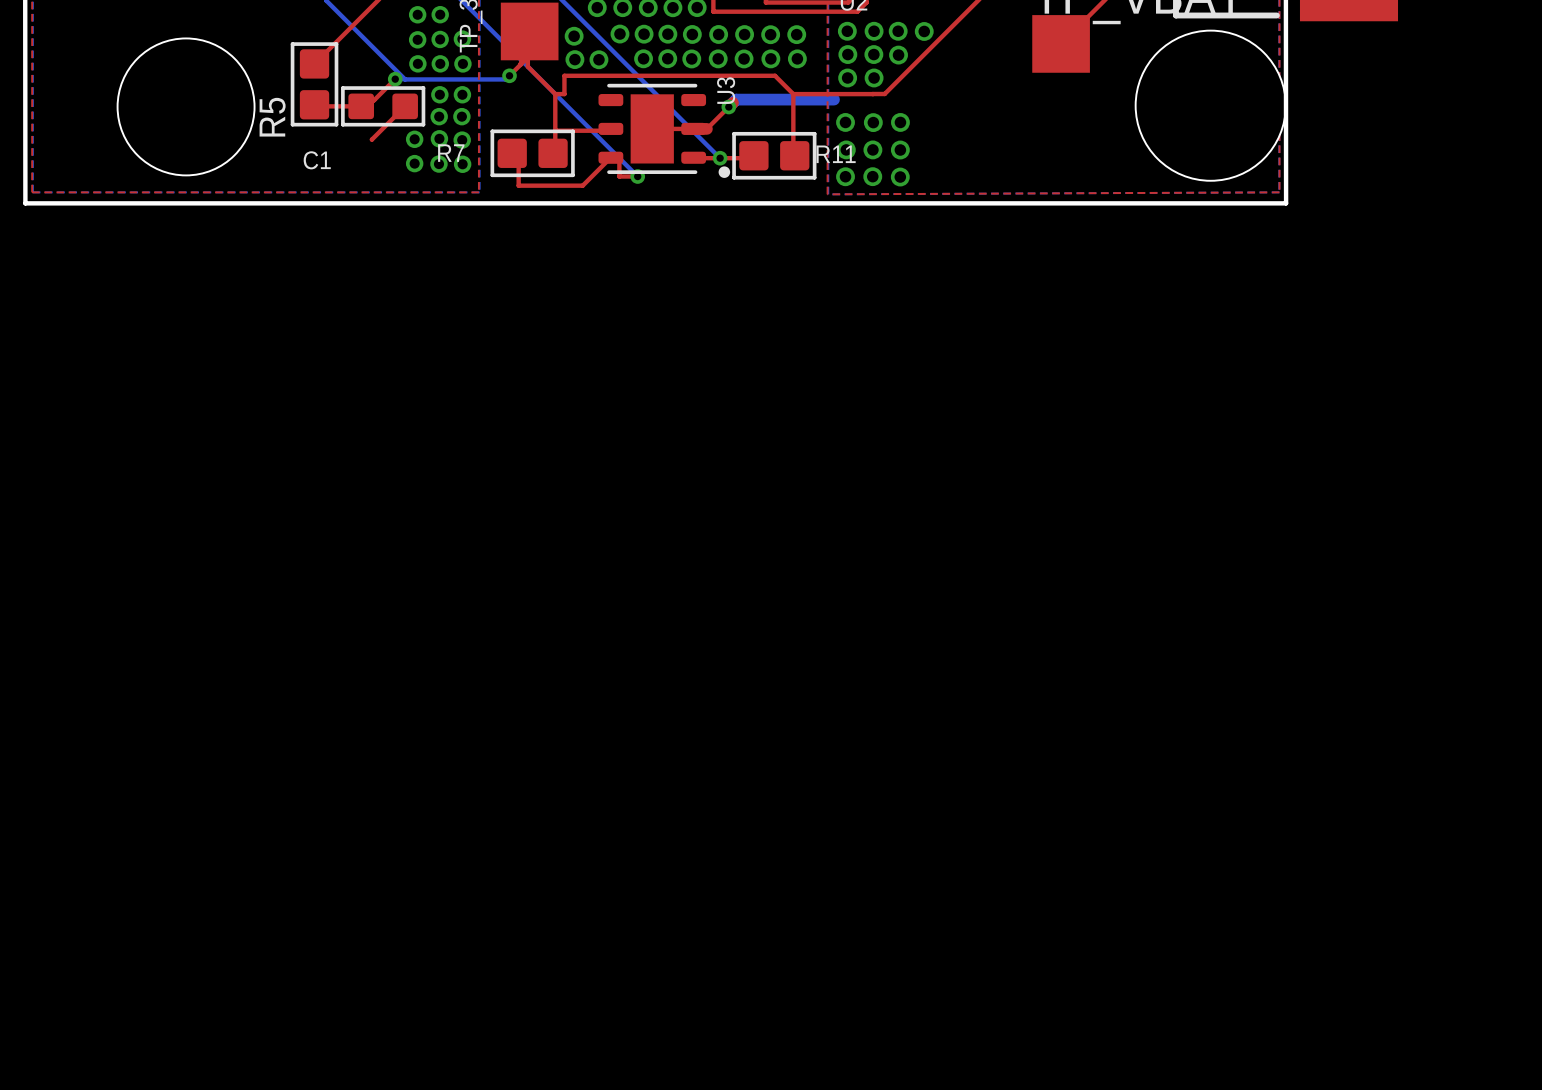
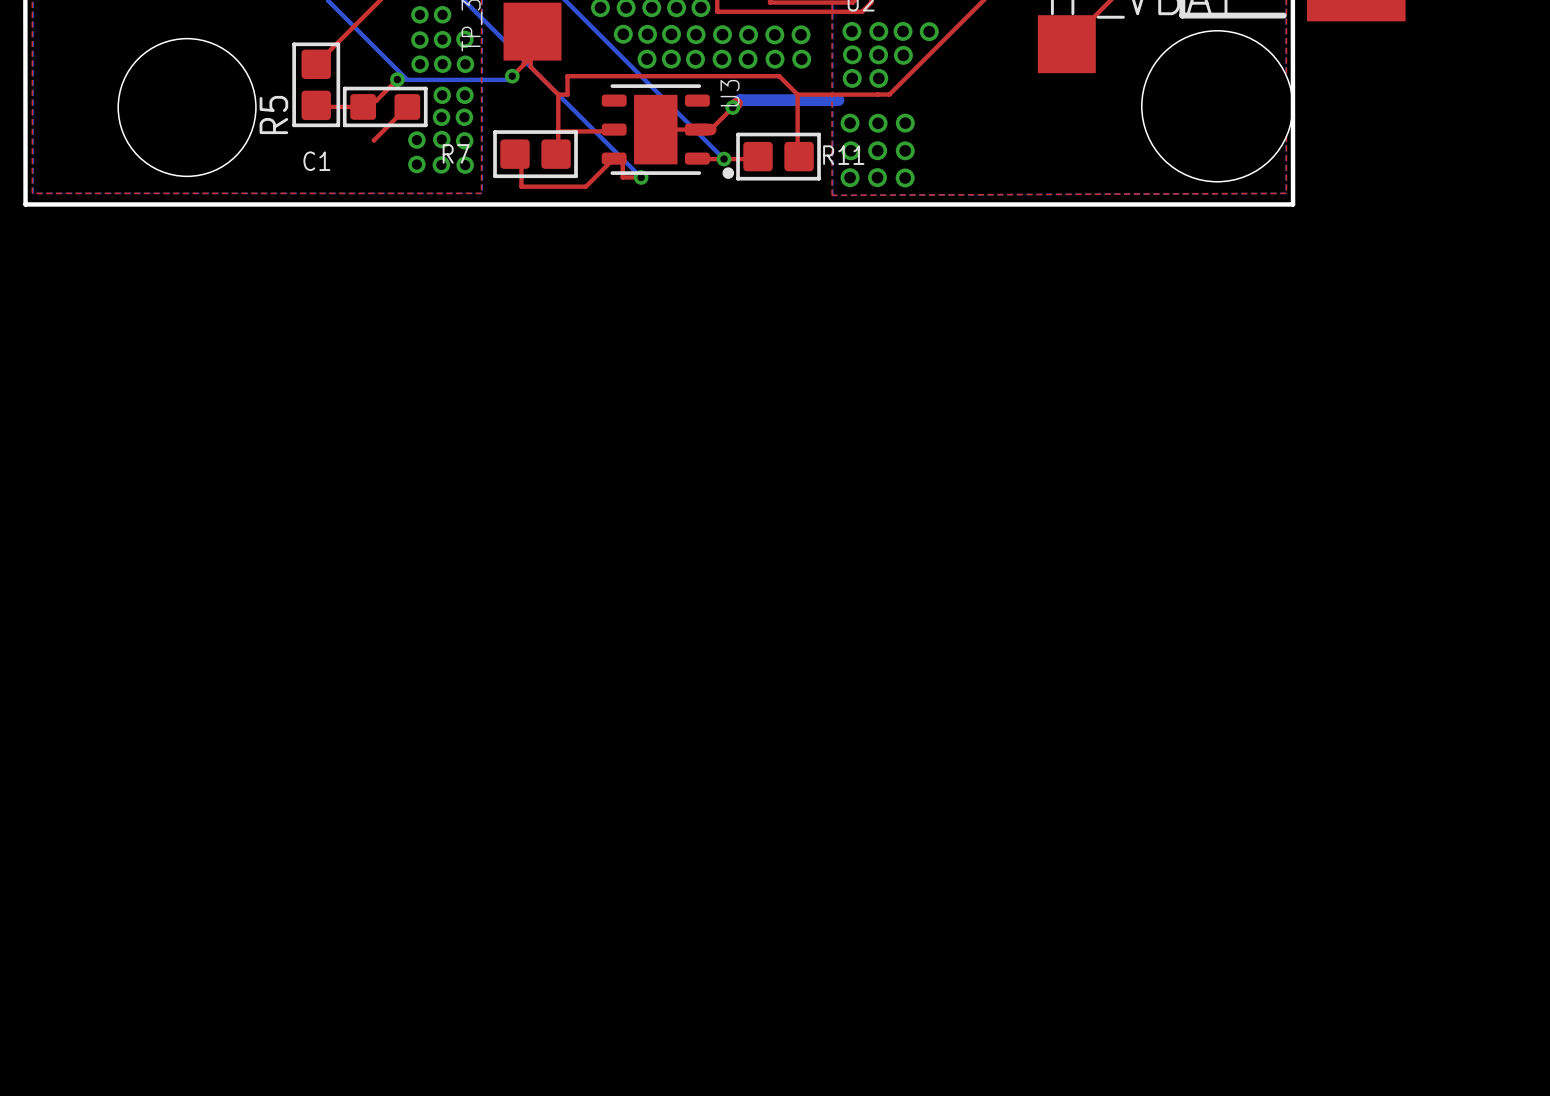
via: (574, 36) -> none
via: (574, 59) -> none
via: (598, 59) -> none

